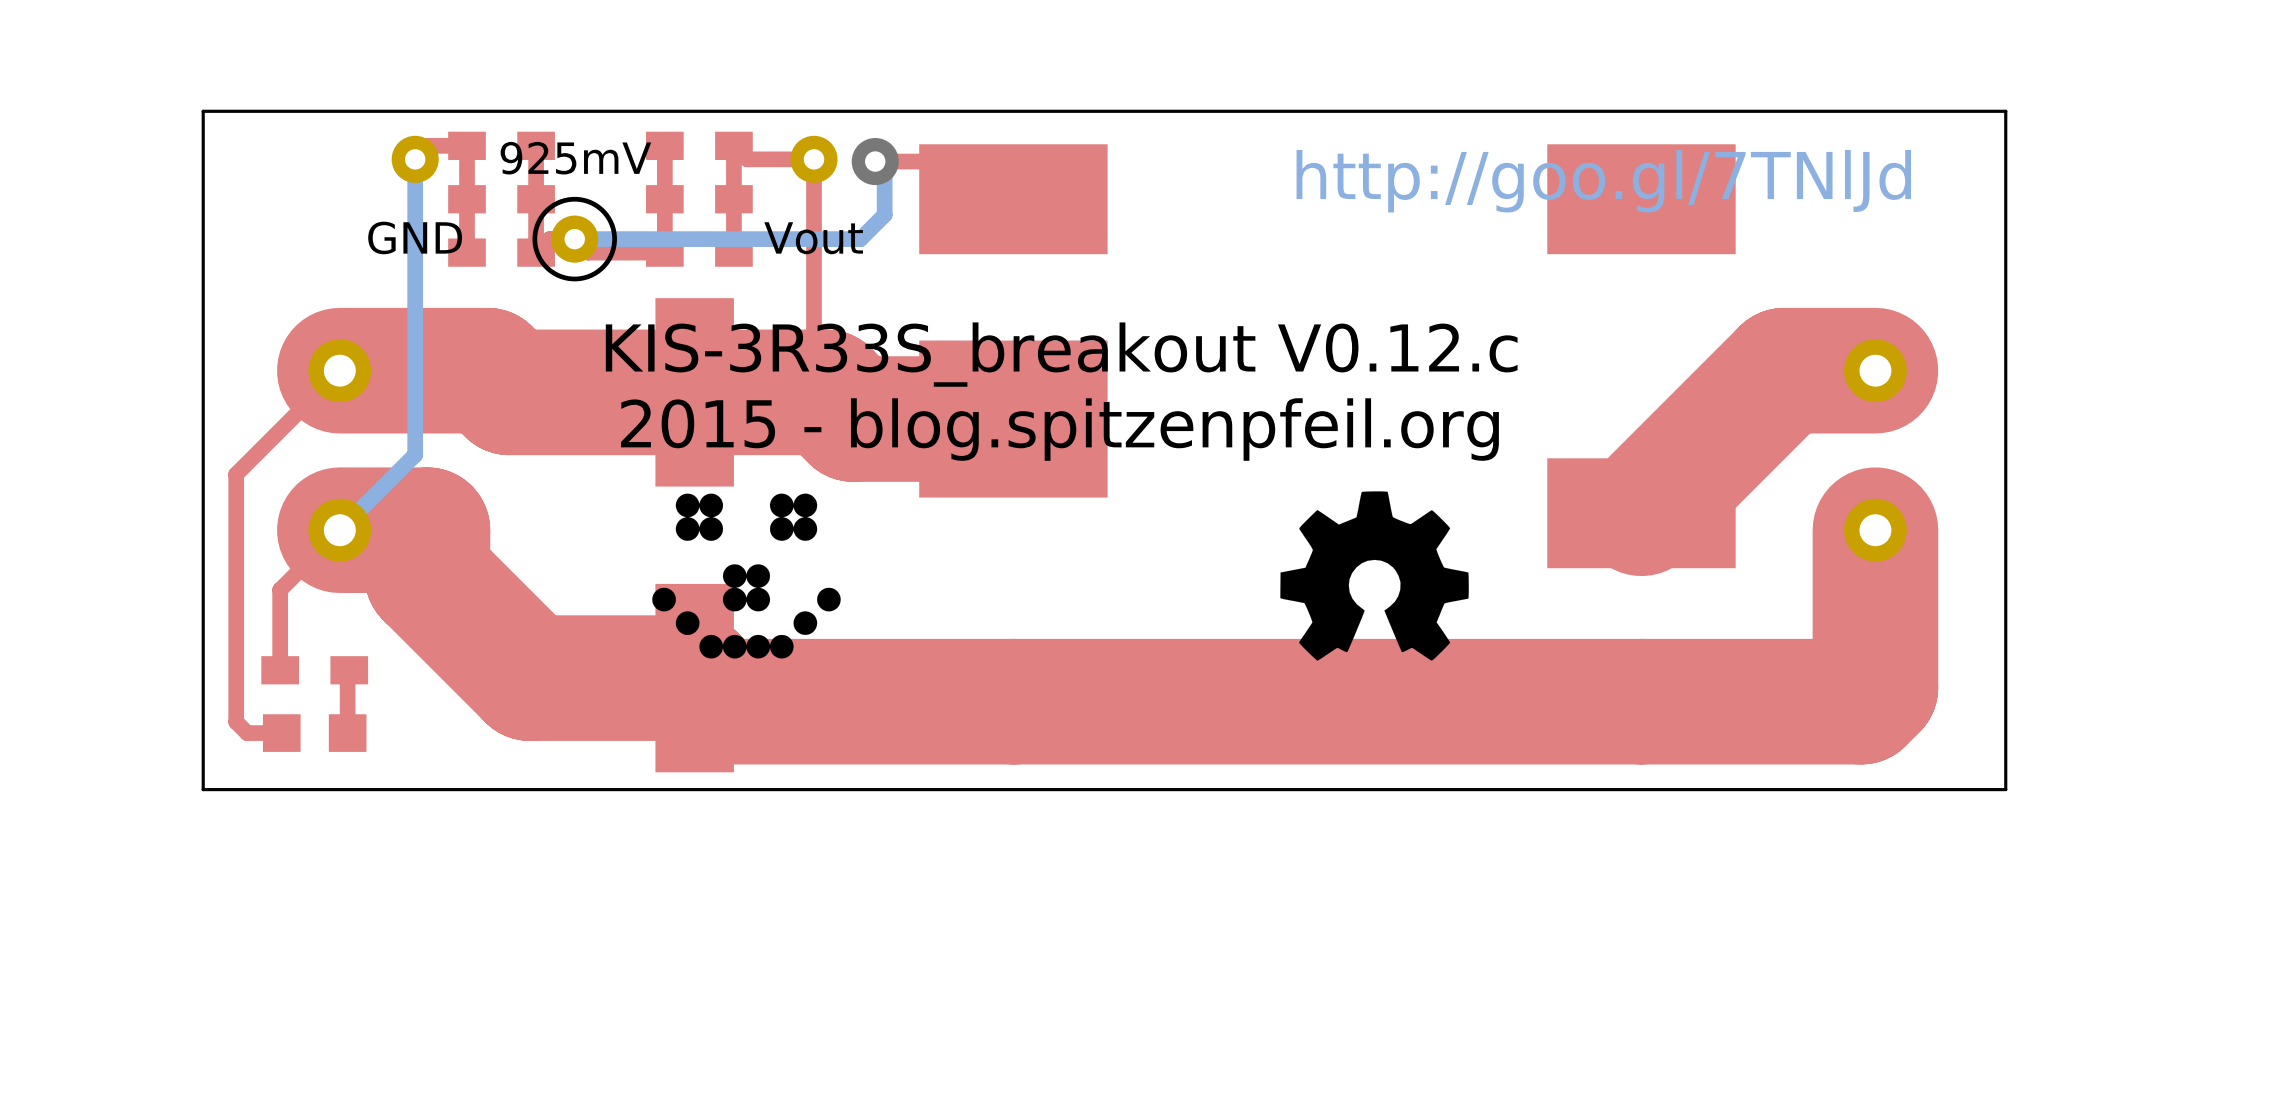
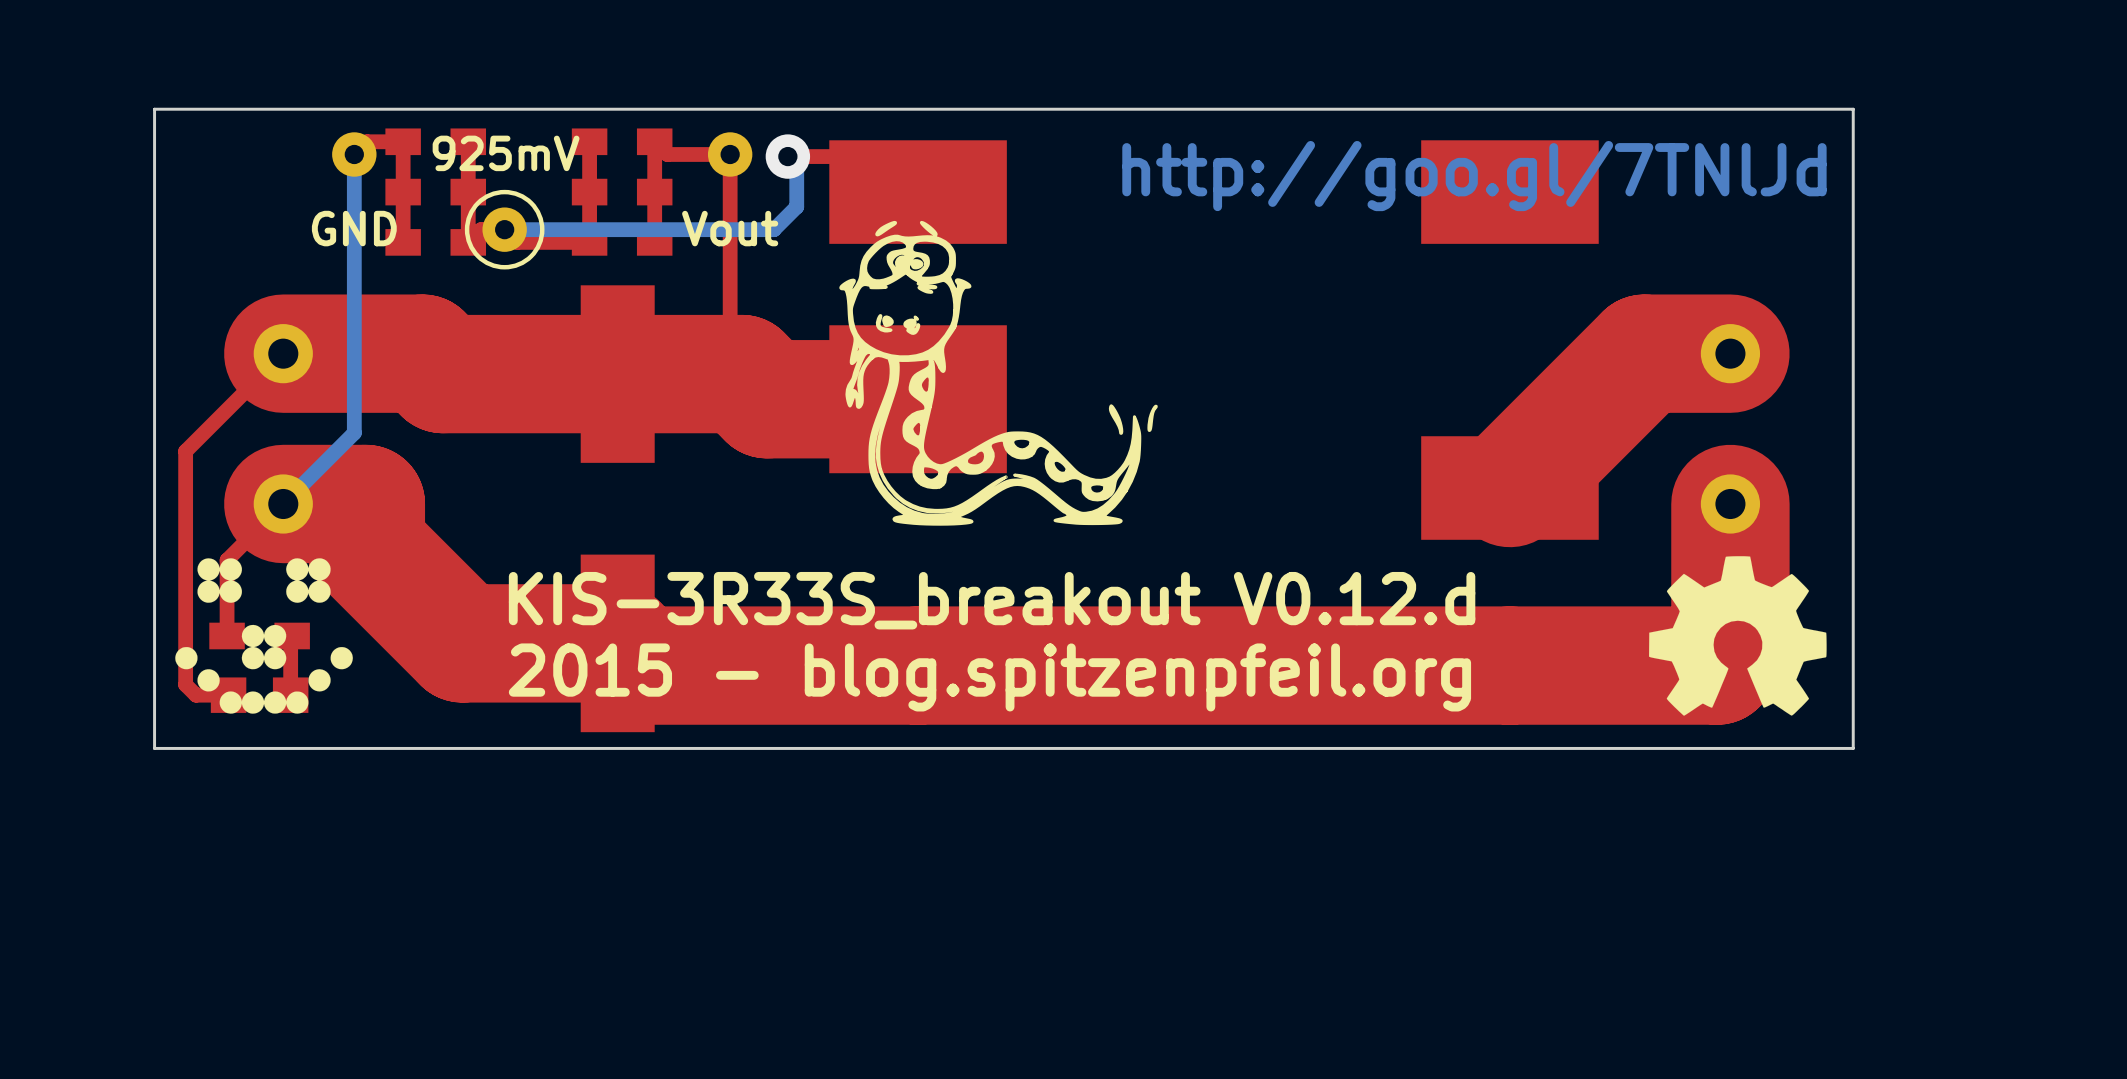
drawing: none -> [839, 220, 1158, 526]
text: KIS-3R33S_breakout V0.12.c (1061, 354) -> none
text position: 2015 - blog.spitzenpfeil.org (1059, 429) -> 2015 - blog.spitzenpfeil.org (989, 677)
drawing position: (746, 576) -> (264, 635)
drawing position: (1374, 576) -> (1737, 635)
text: none -> KIS-3R33S_breakout V0.12.d (992, 600)

